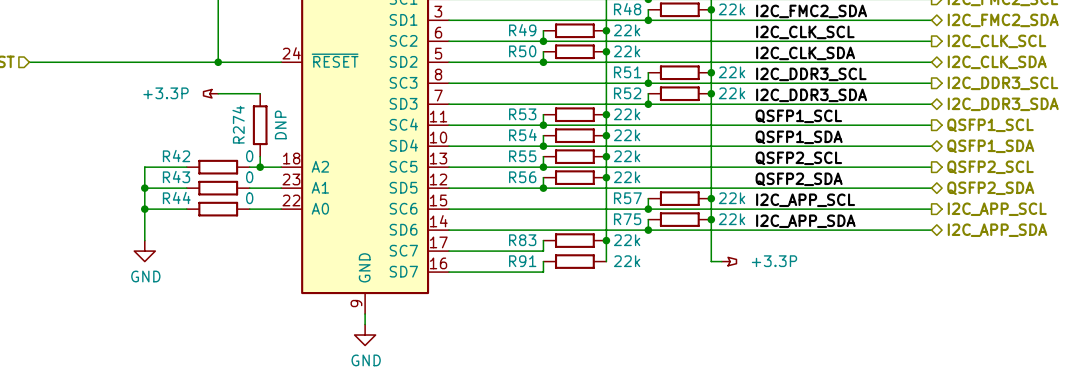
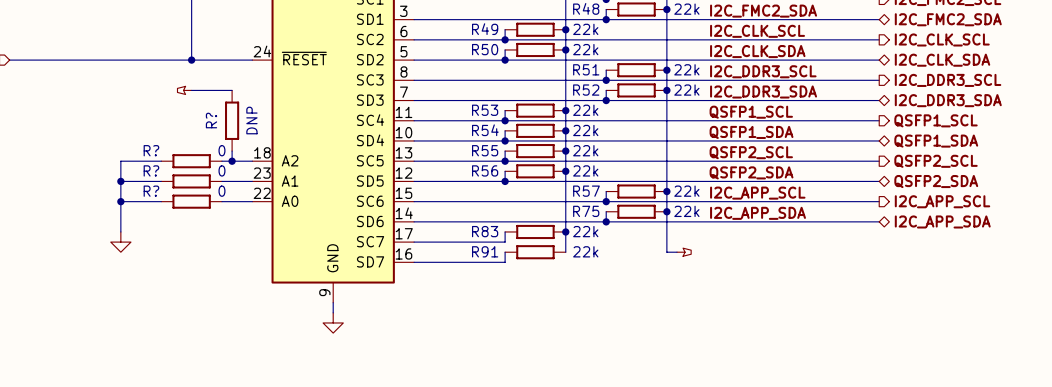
power symbol text: +3.3P (166, 93) -> none
R274 name: R274 (238, 124) -> R? (211, 120)
R42 name: R42 (176, 156) -> R? (151, 150)
R43 name: R43 (176, 177) -> R? (151, 170)
R44 name: R44 (176, 197) -> R? (151, 191)
power symbol text: +3.3P (774, 261) -> none
power symbol text: GND (145, 276) -> none
power symbol text: GND (366, 360) -> none

